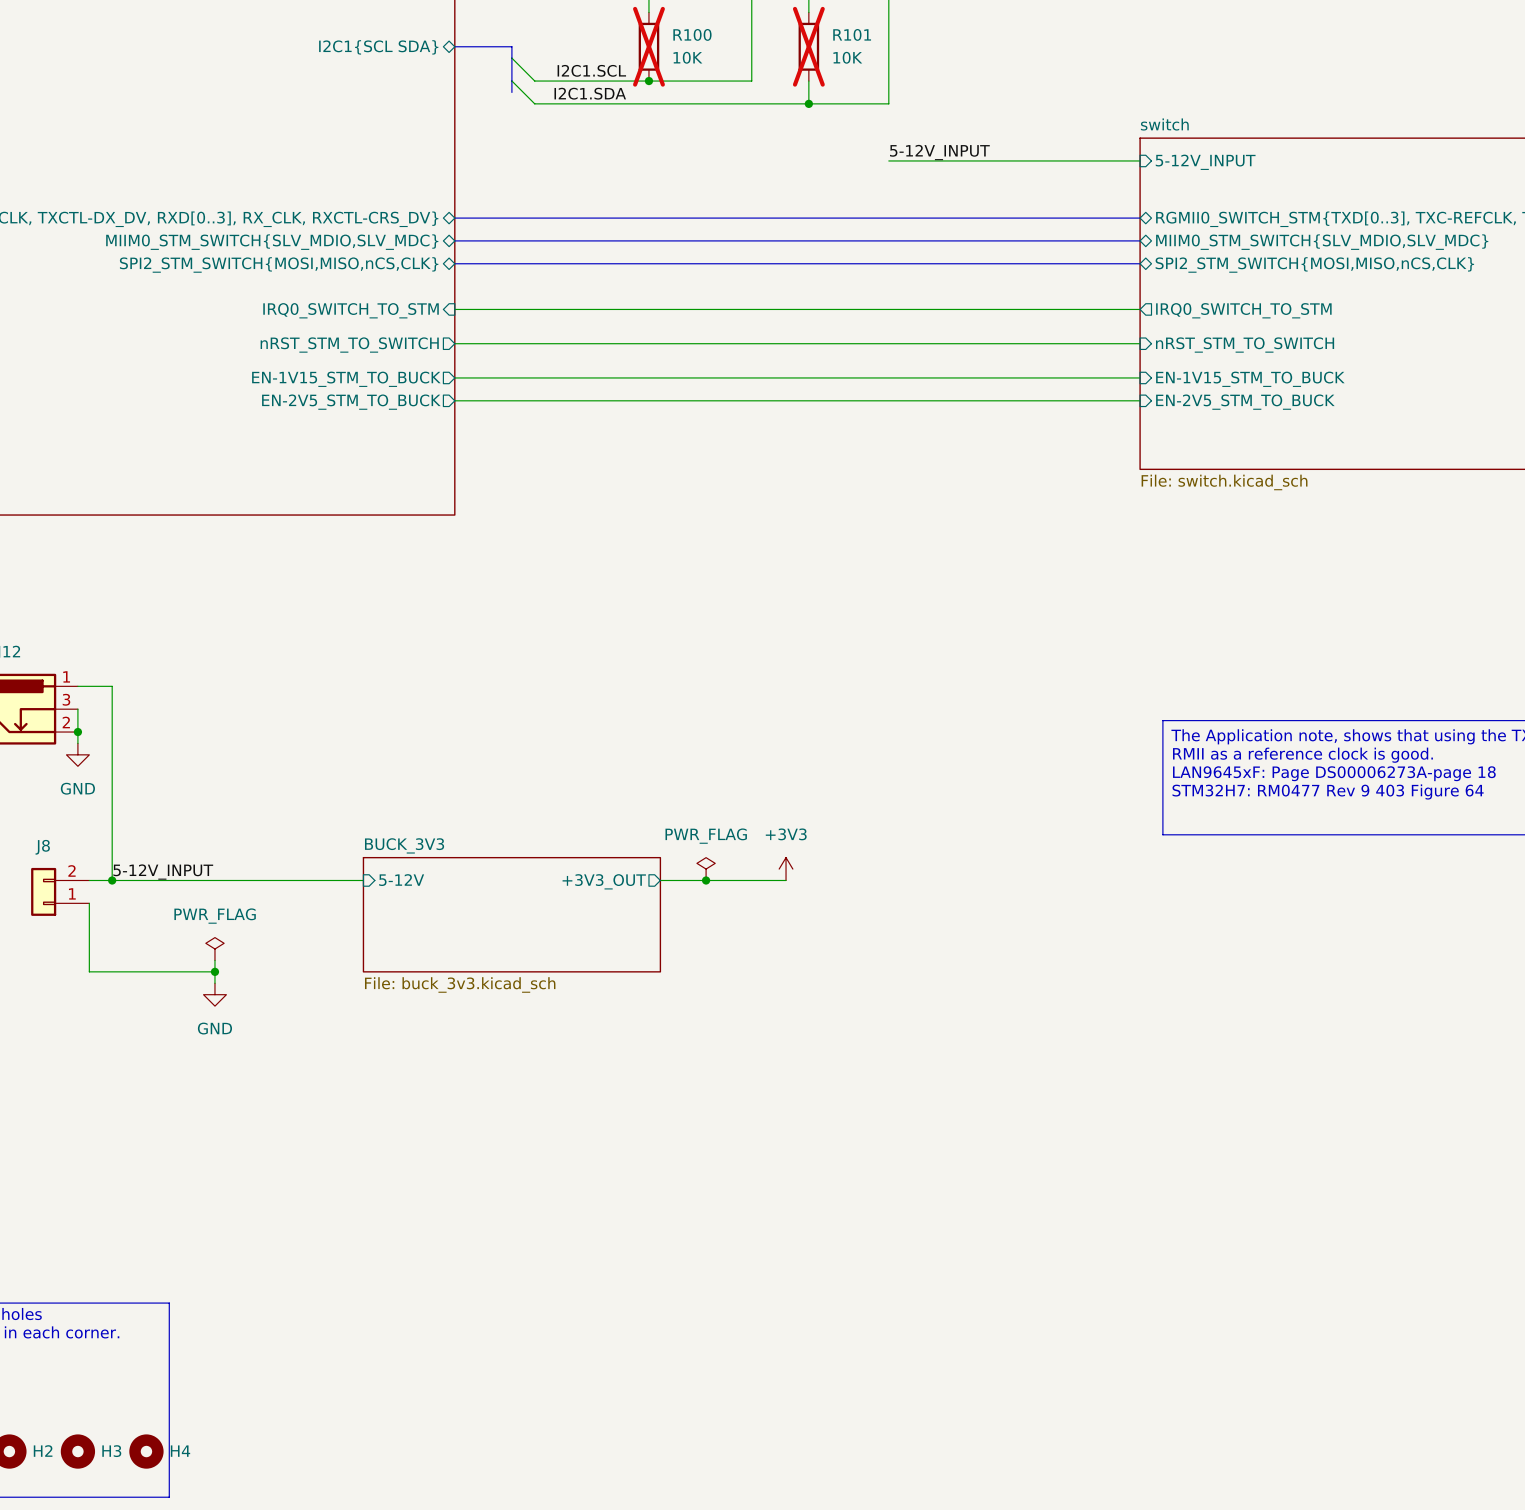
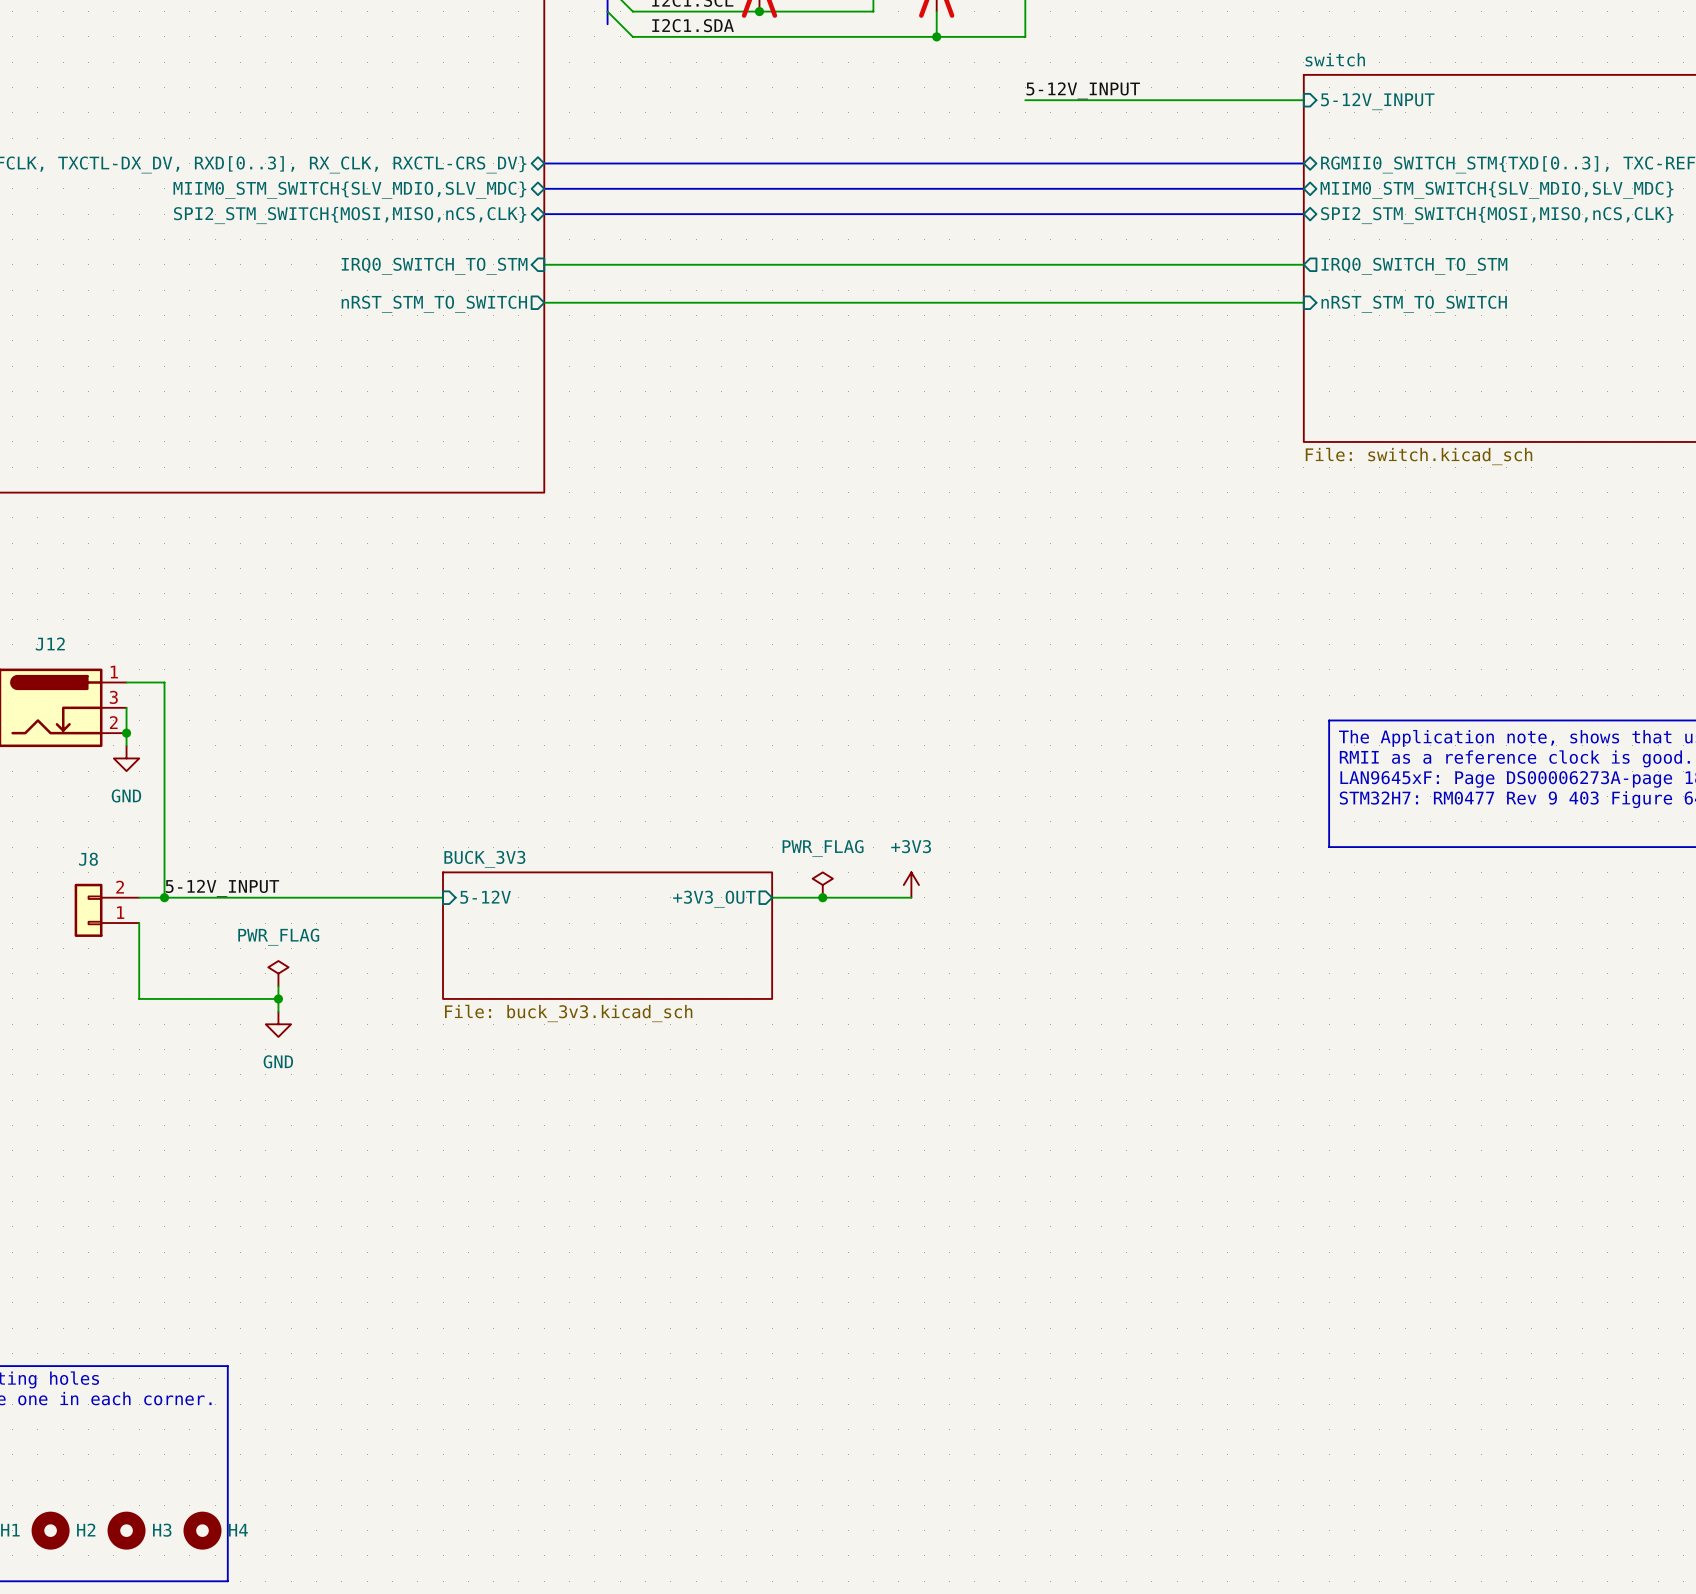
wire: (454, 377) (1140, 377) -> none
sheet pin: EN-1V15_STM_TO_BUCK (346, 379) -> none
sheet pin: EN-1V15_STM_TO_BUCK (1250, 379) -> none
wire: (454, 400) (1140, 400) -> none
sheet pin: EN-2V5_STM_TO_BUCK (351, 402) -> none
sheet pin: EN-2V5_STM_TO_BUCK (1245, 402) -> none

